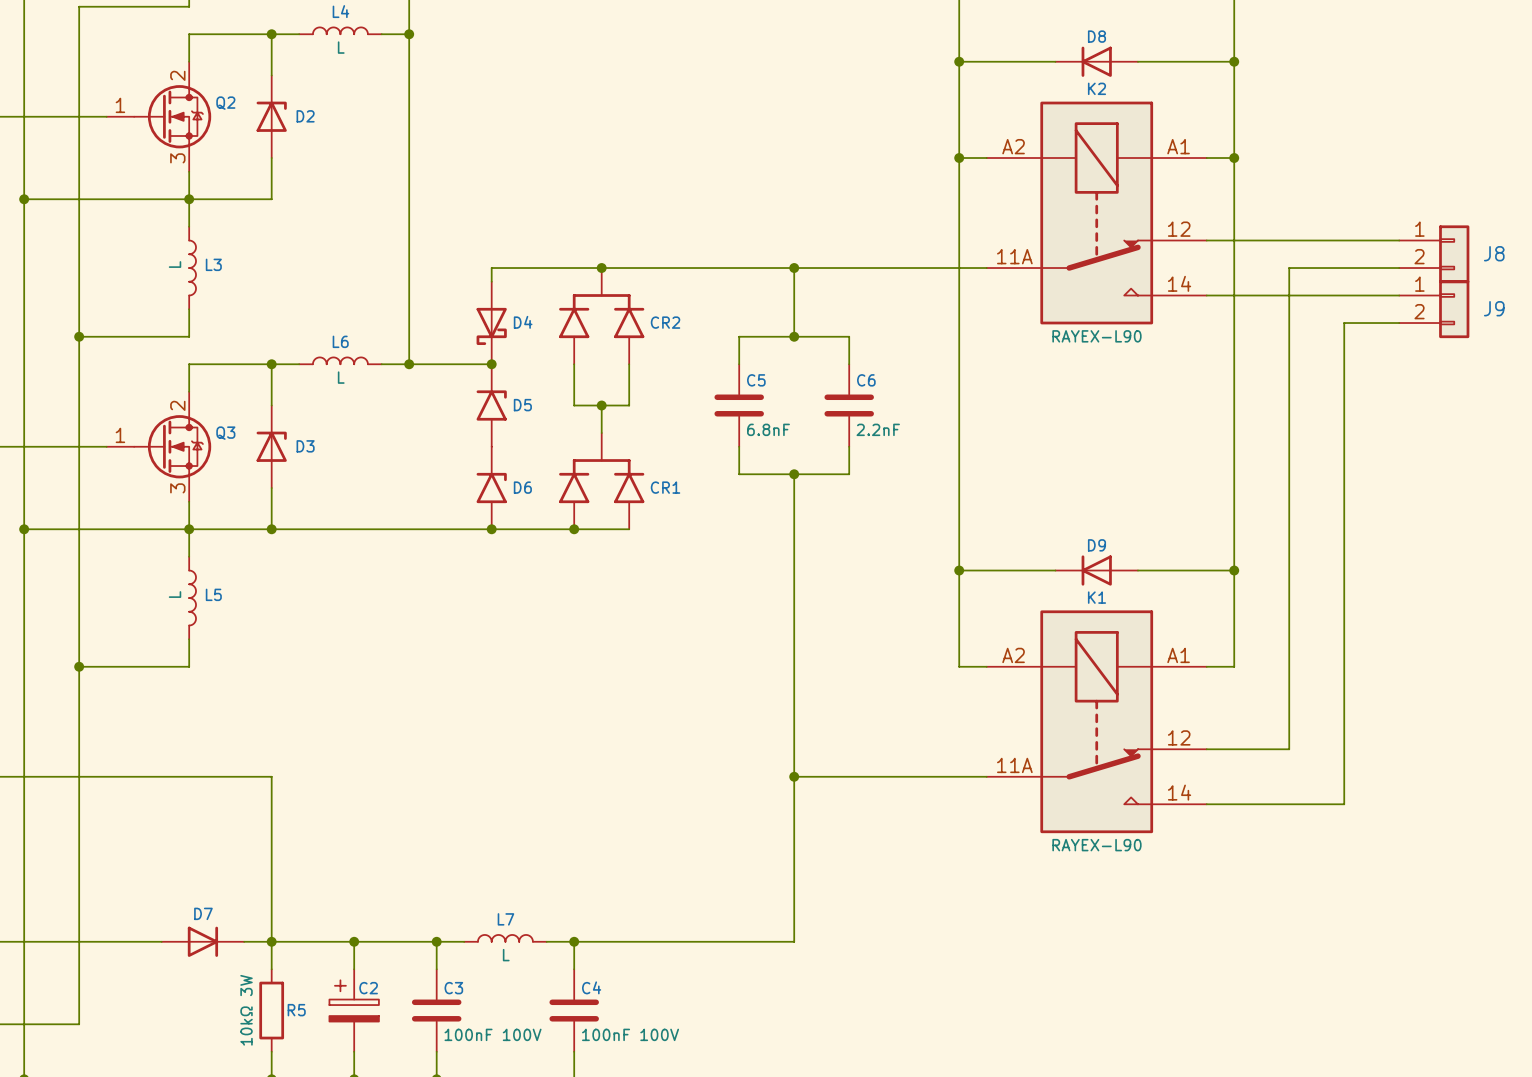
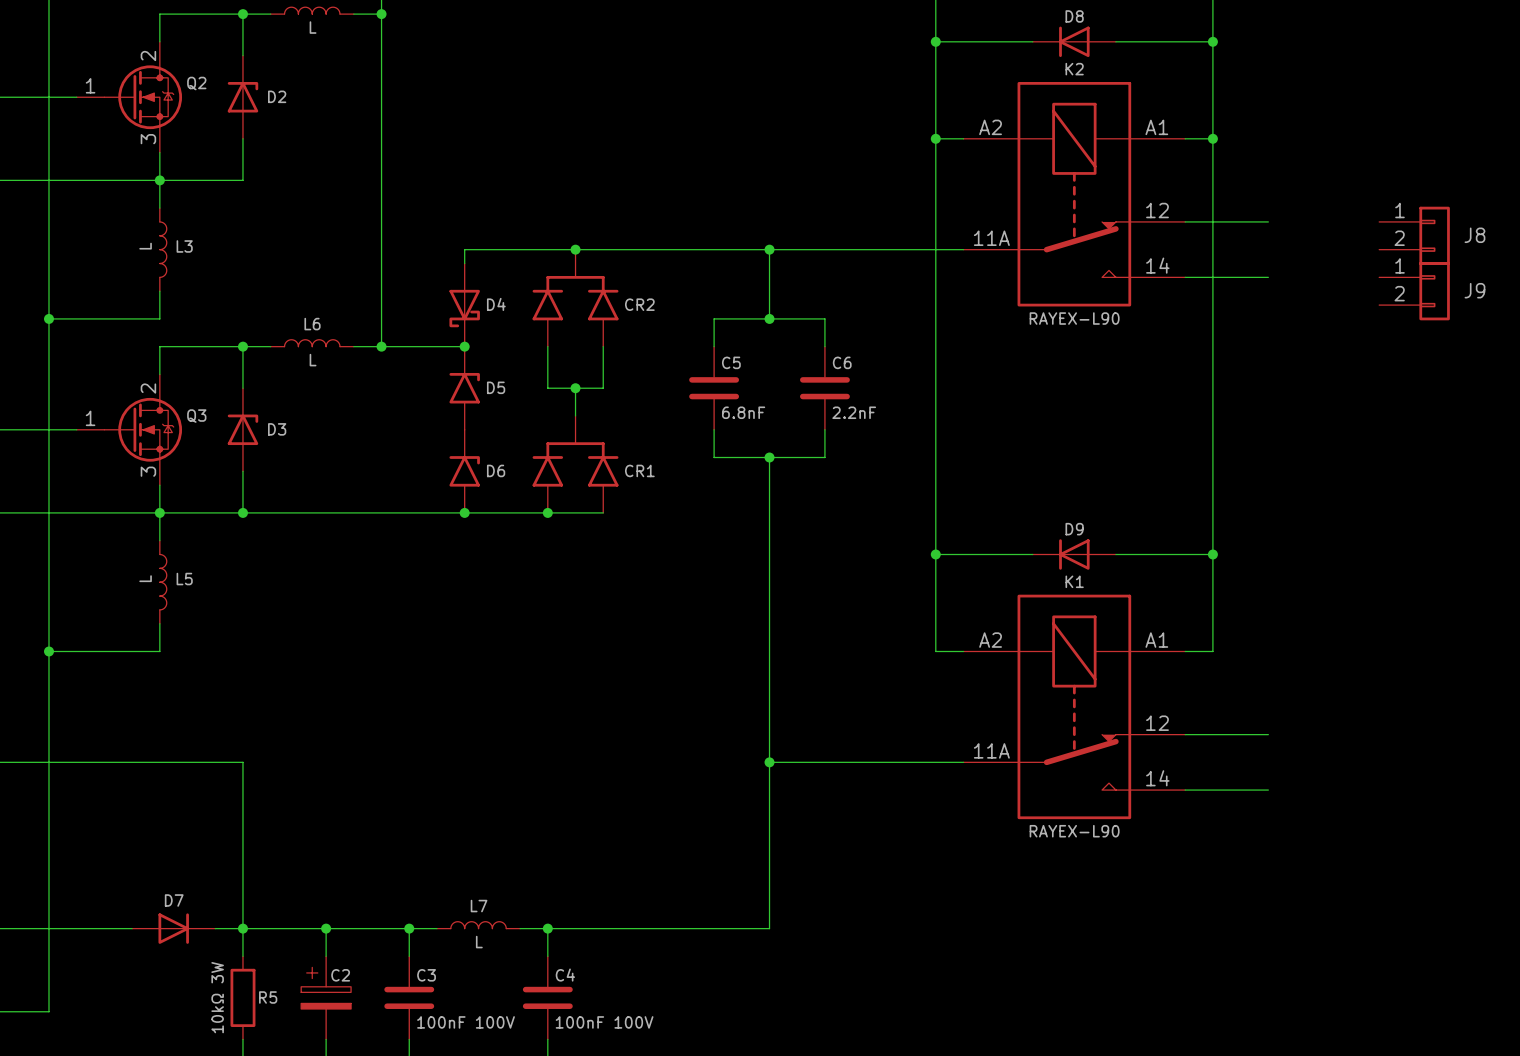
wire: (1289, 240) (1399, 240) -> none
wire: (1399, 268) (1289, 268) (1289, 749) -> none
wire: (1289, 295) (1399, 295) -> none
wire: (1399, 323) (1344, 323) (1344, 804) (1289, 804) -> none

